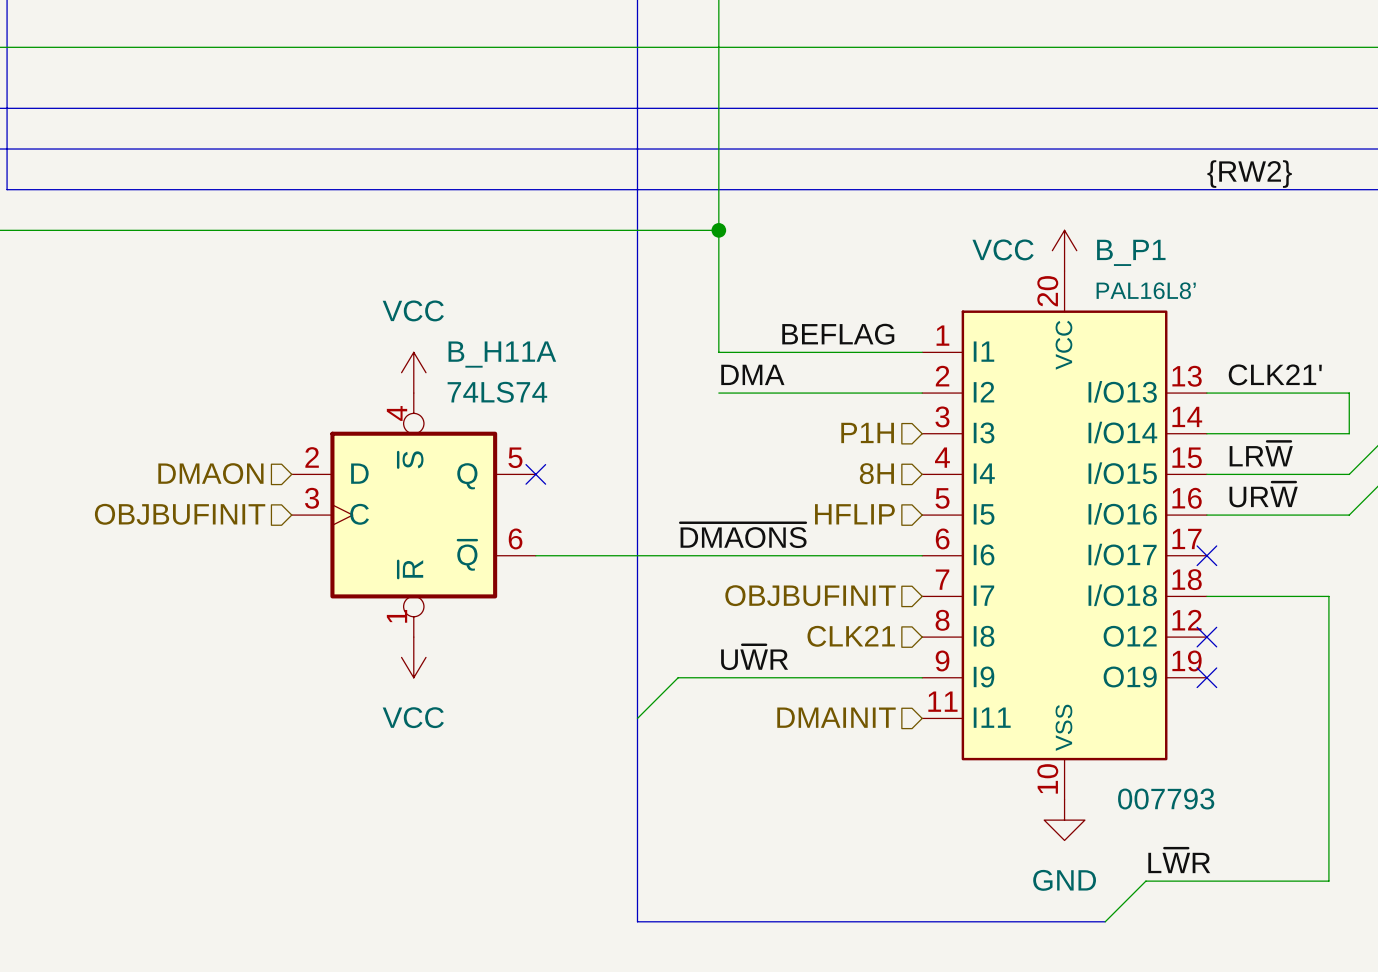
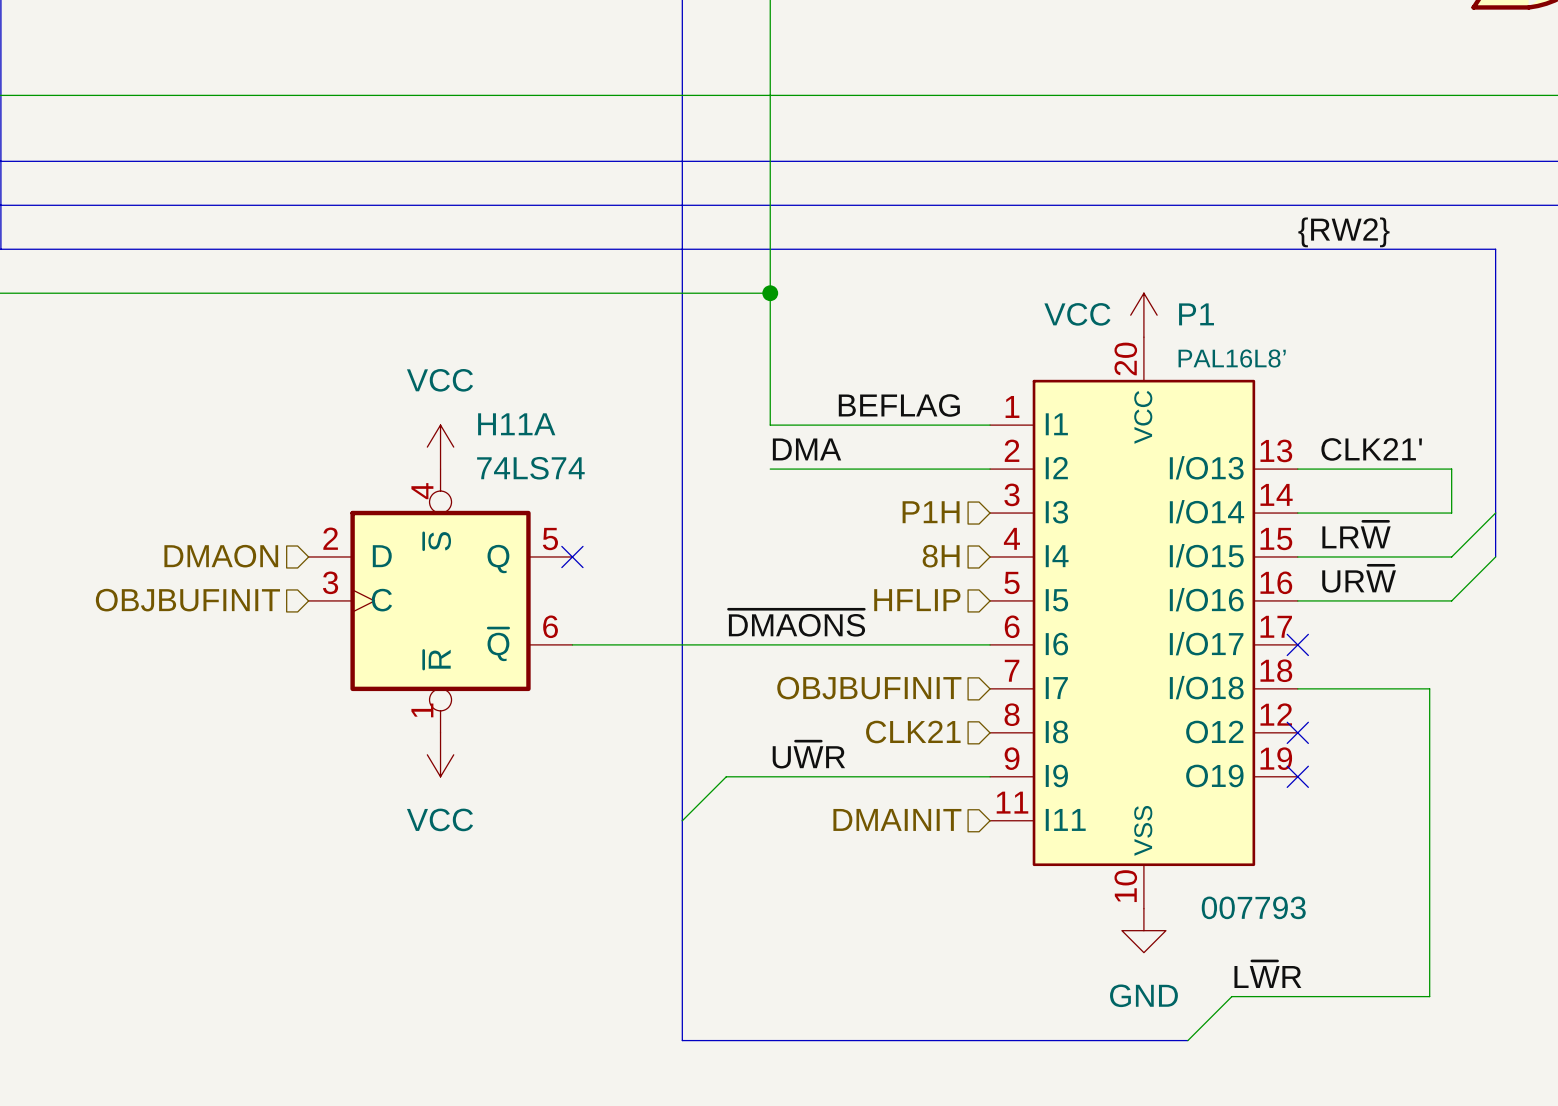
B_P1 name: B_P1 (1131, 252) -> P1 (1196, 314)
B_H11A name: B_H11A (502, 354) -> H11A (516, 424)

